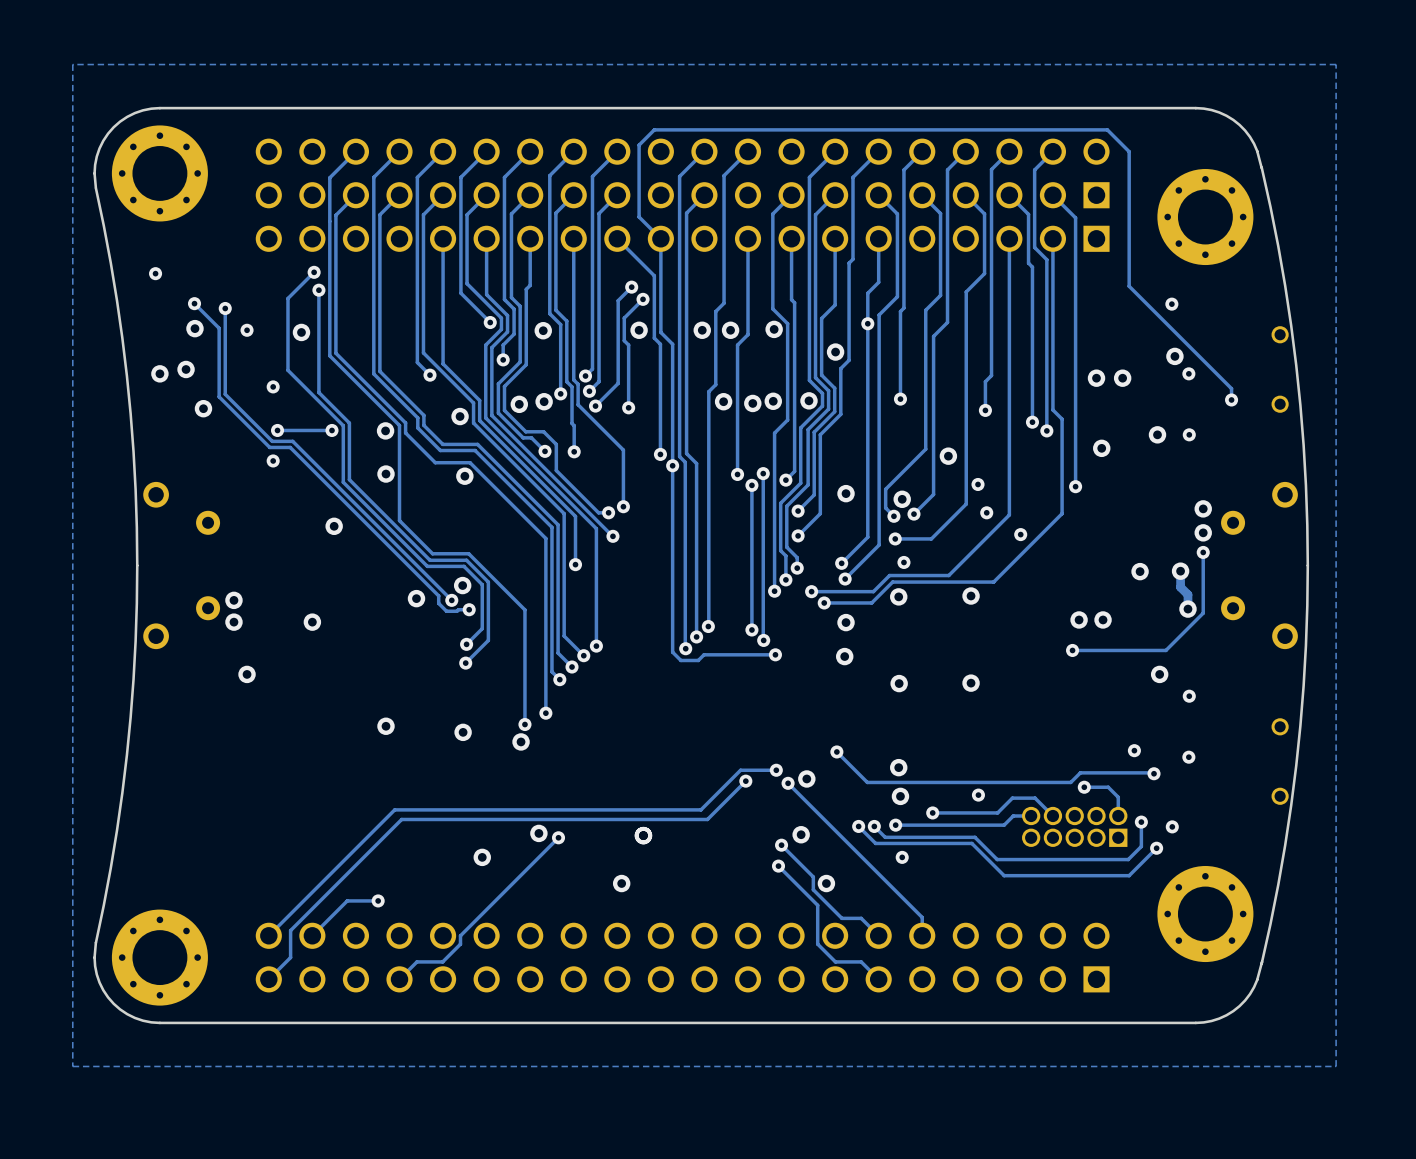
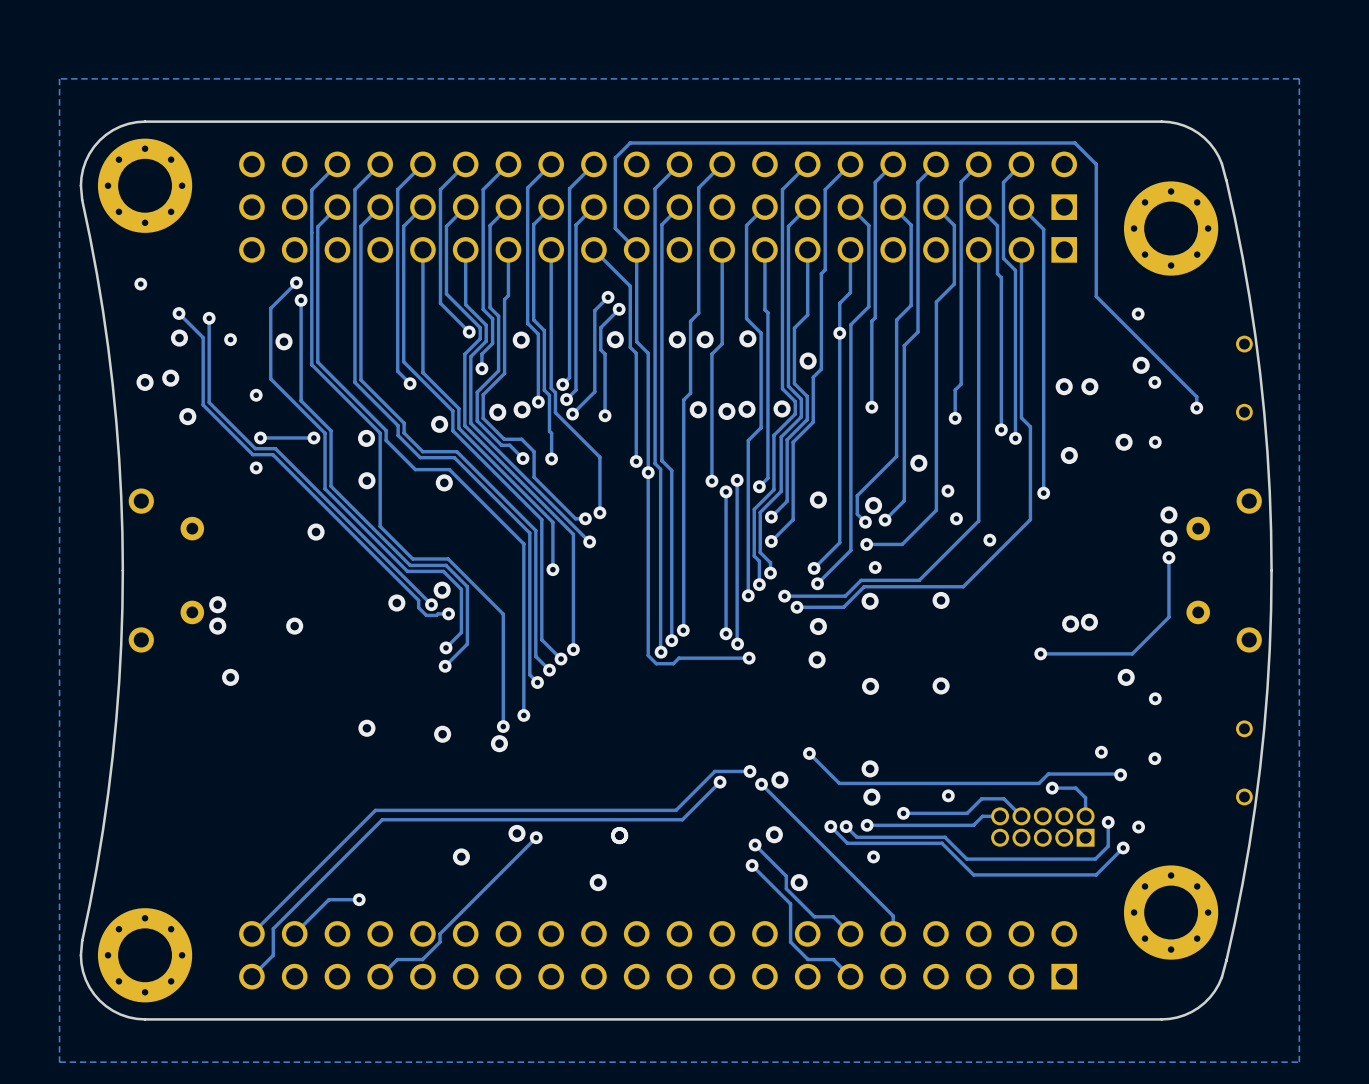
via: (1140, 571) -> none
track: (1180, 571) (1180, 587) (1187, 594) (1187, 609) -> none
via: (1180, 571) -> none
via: (1187, 609) -> none
via: none -> (1089, 622)
via: (1079, 619) -> none

